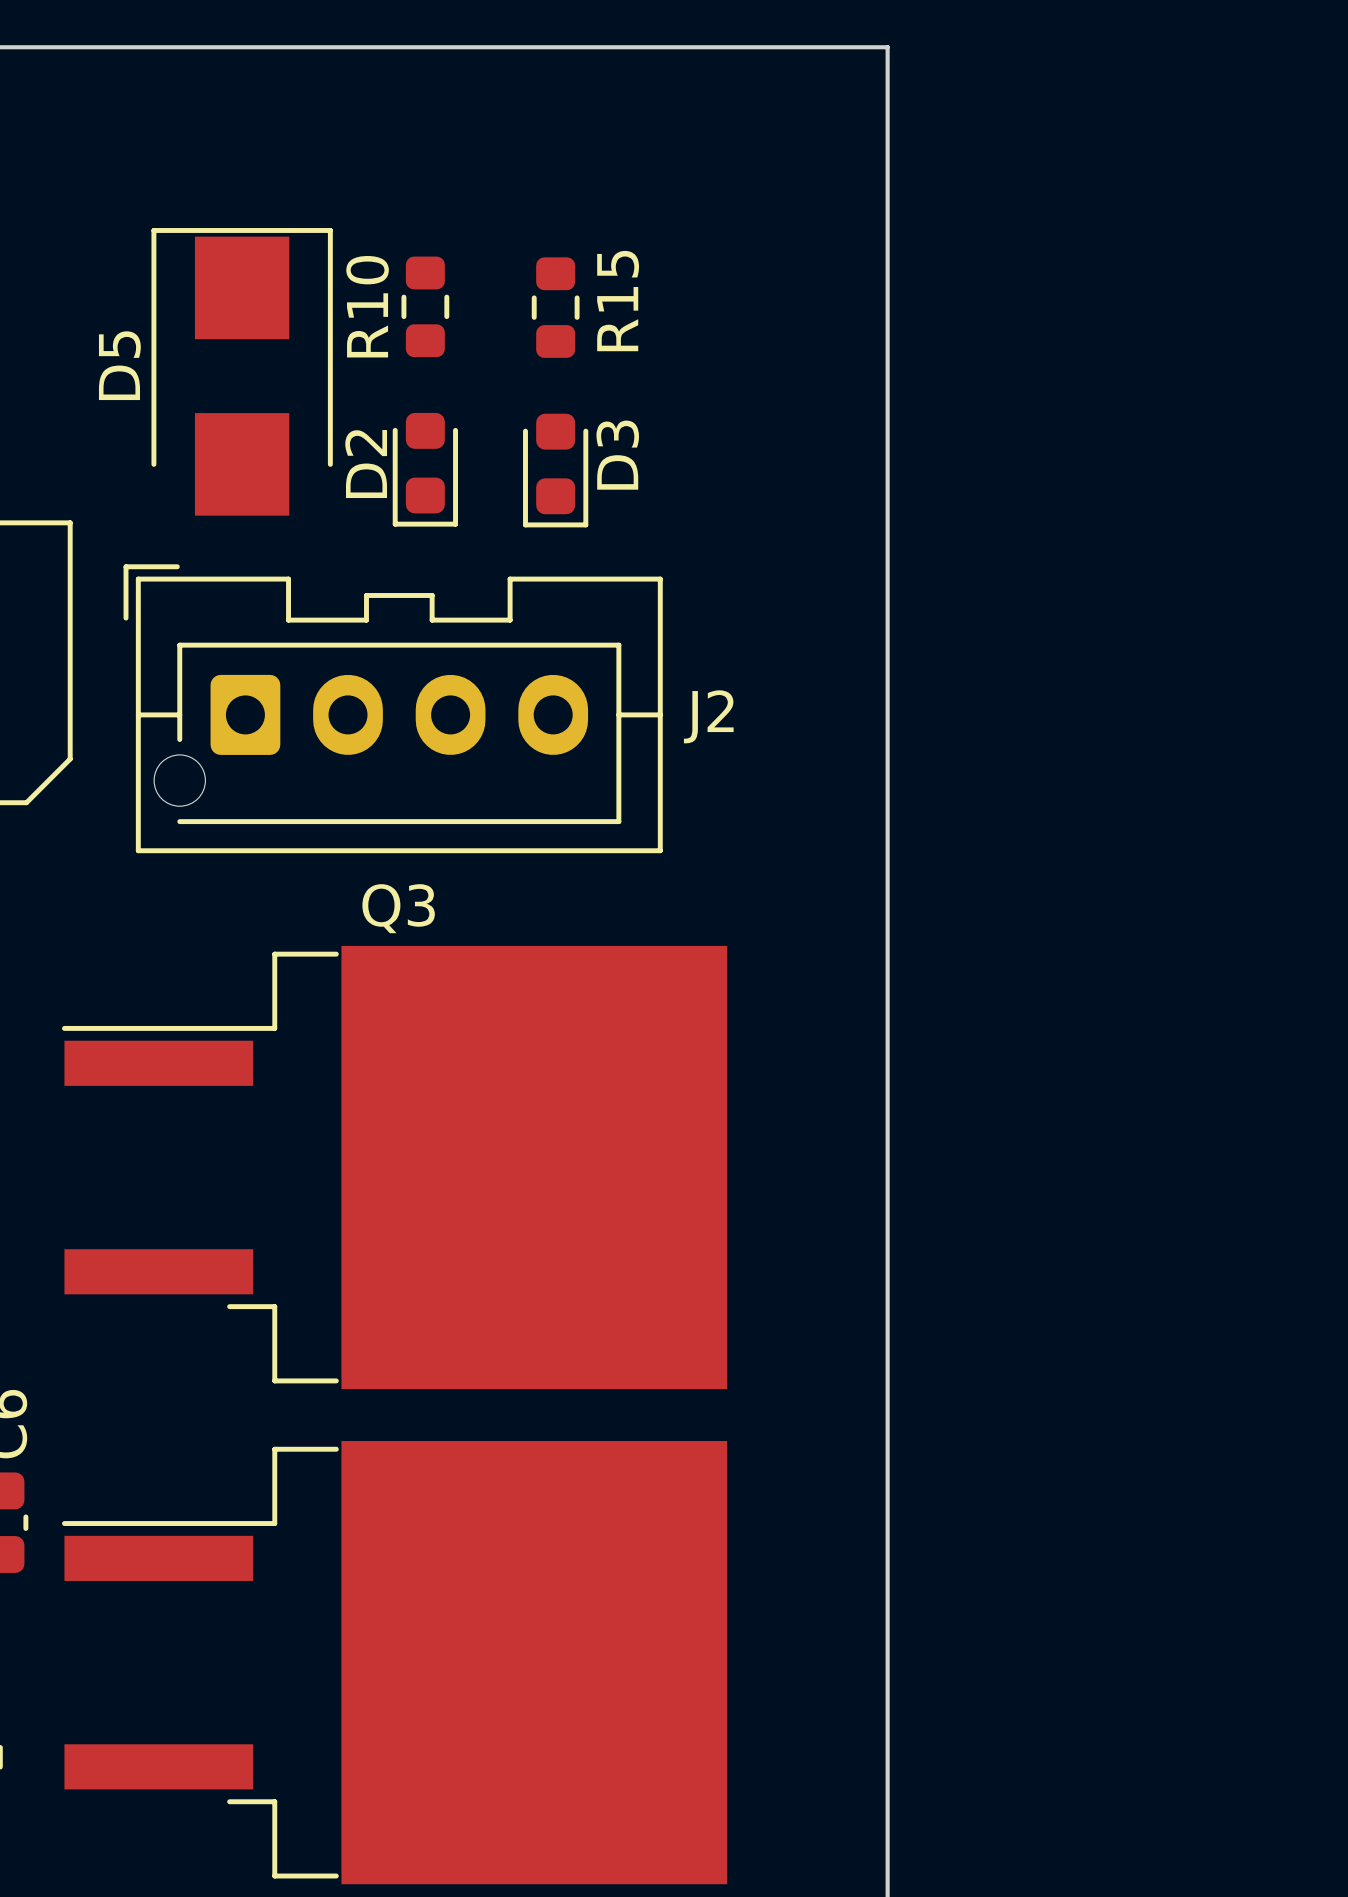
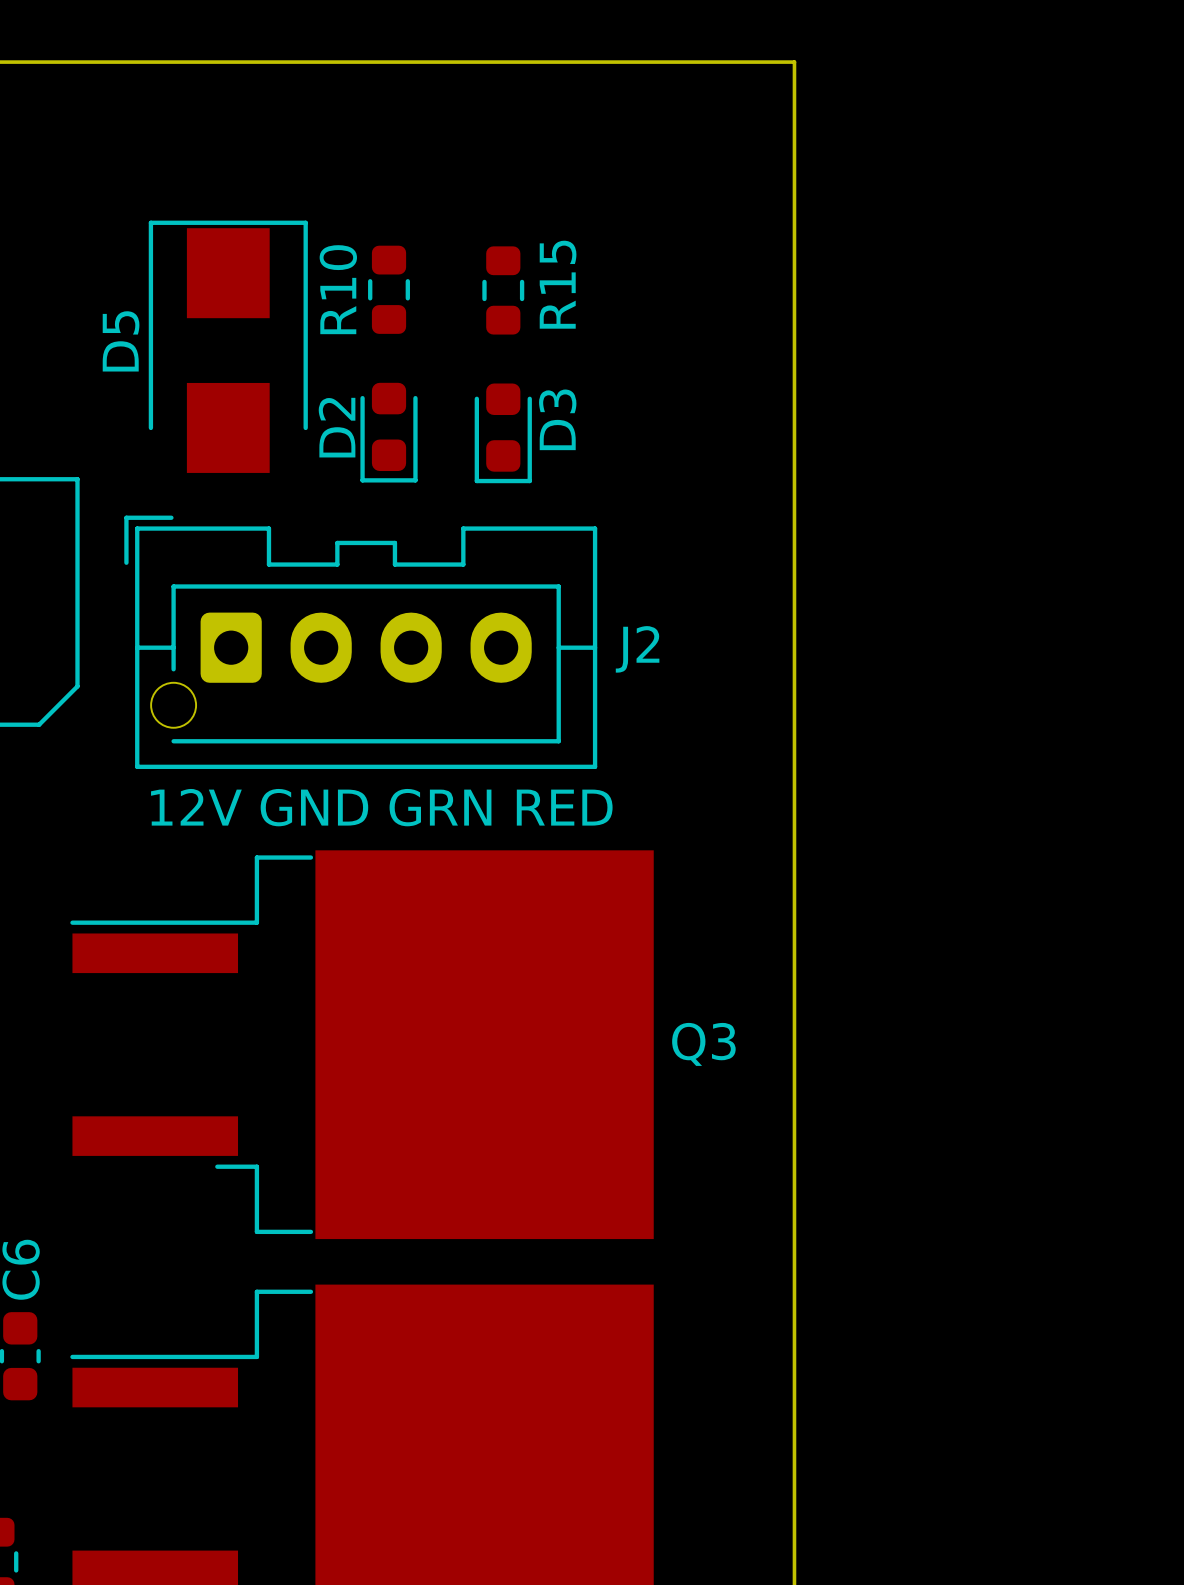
text: none -> 12V GND GRN RED (381, 807)
Q3 name position: Q3 (398, 908) -> Q3 (703, 1044)

